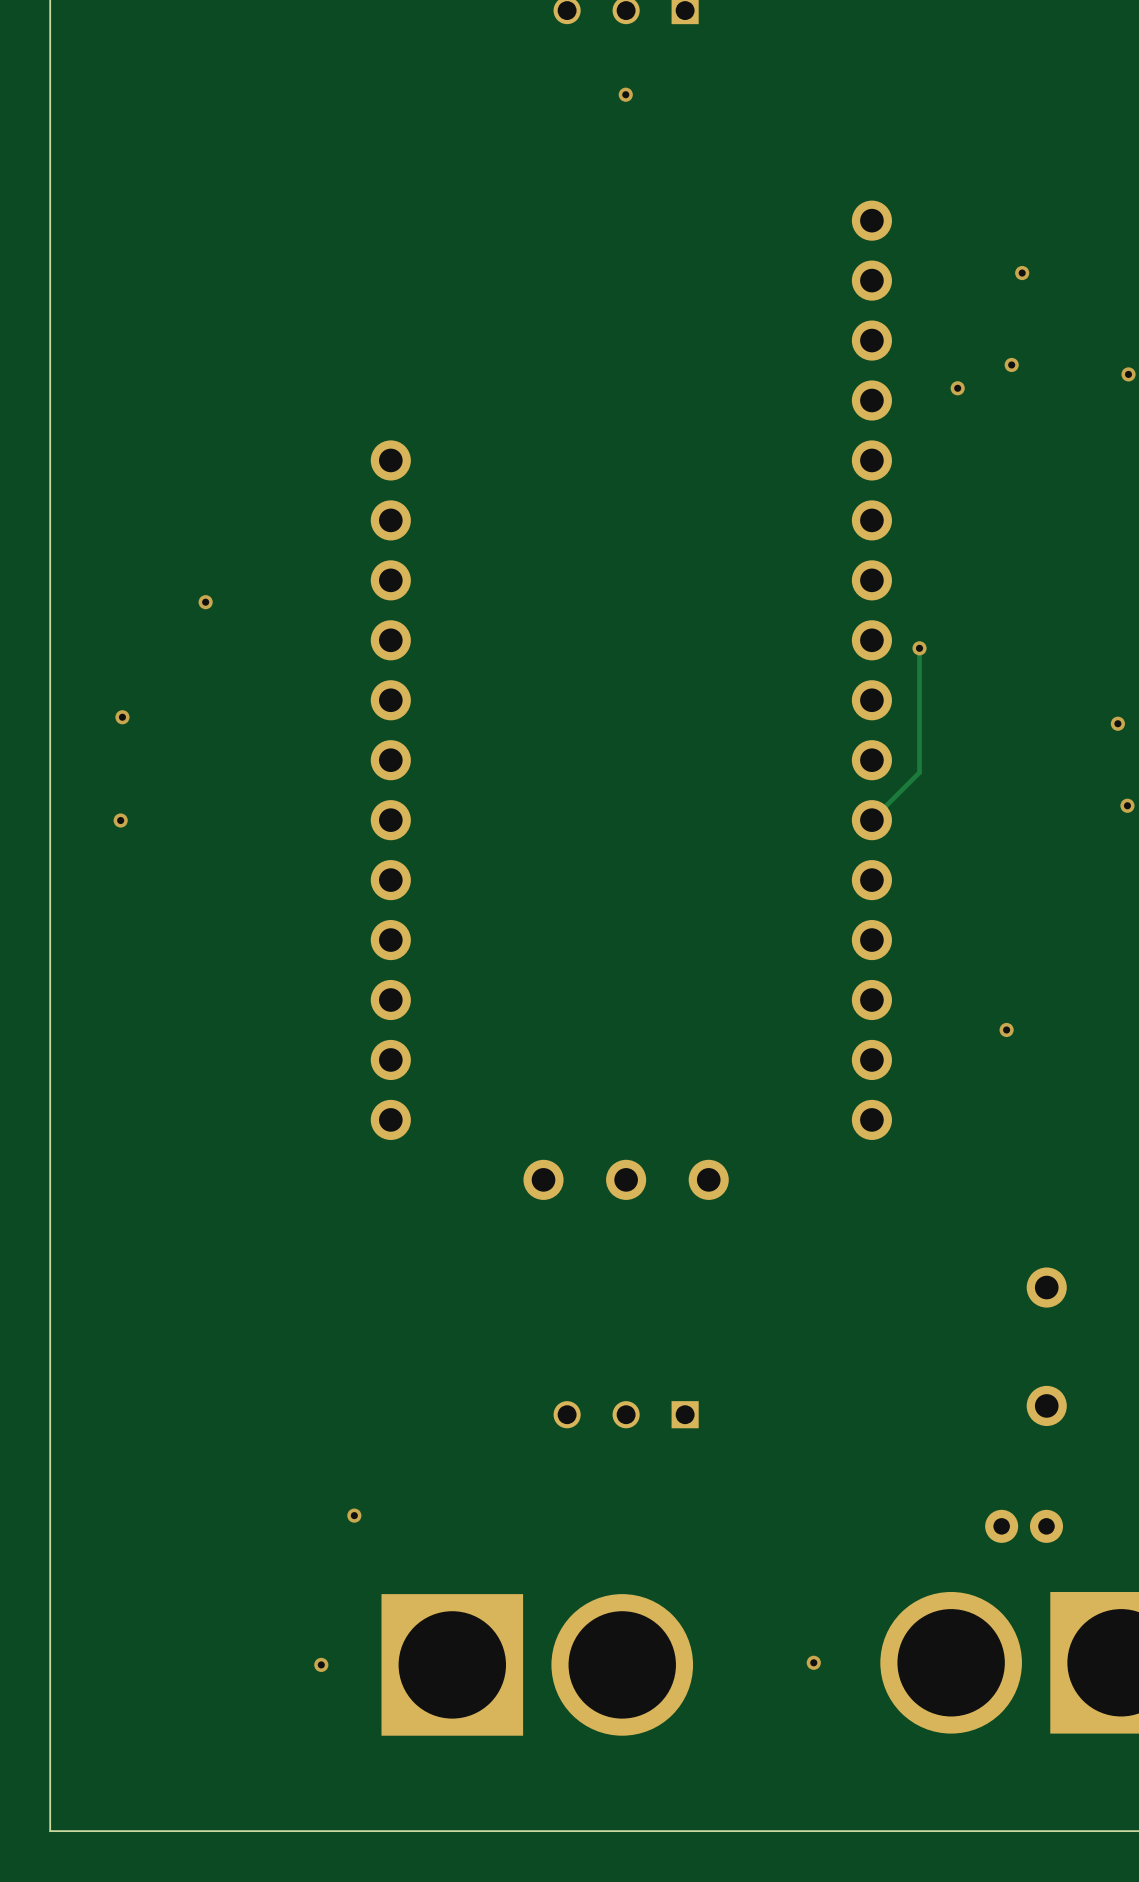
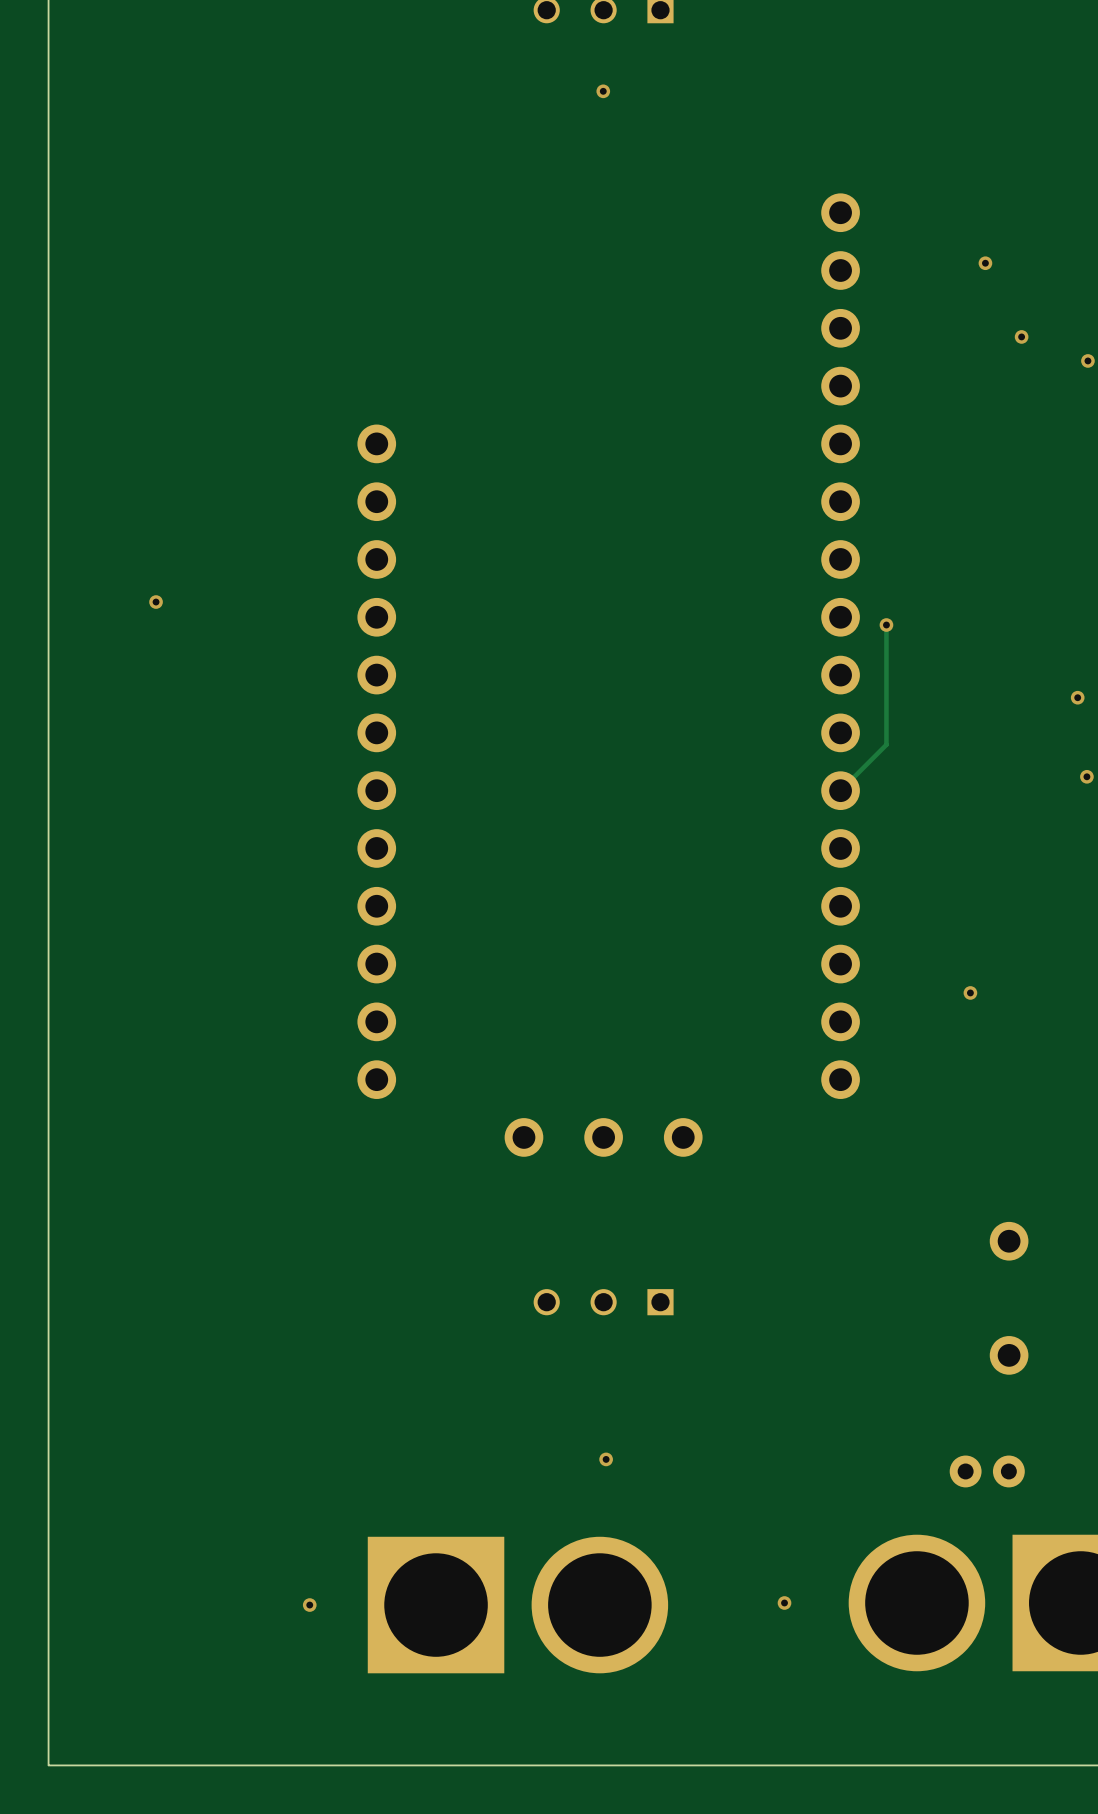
via position: (1011, 364) -> (1021, 336)
via: (957, 388) -> none
via position: (205, 602) -> (156, 602)
via: (122, 717) -> none
via: (120, 820) -> none
part position: (626, 1414) -> (603, 1302)
via: none -> (606, 1459)
via: (354, 1515) -> none

